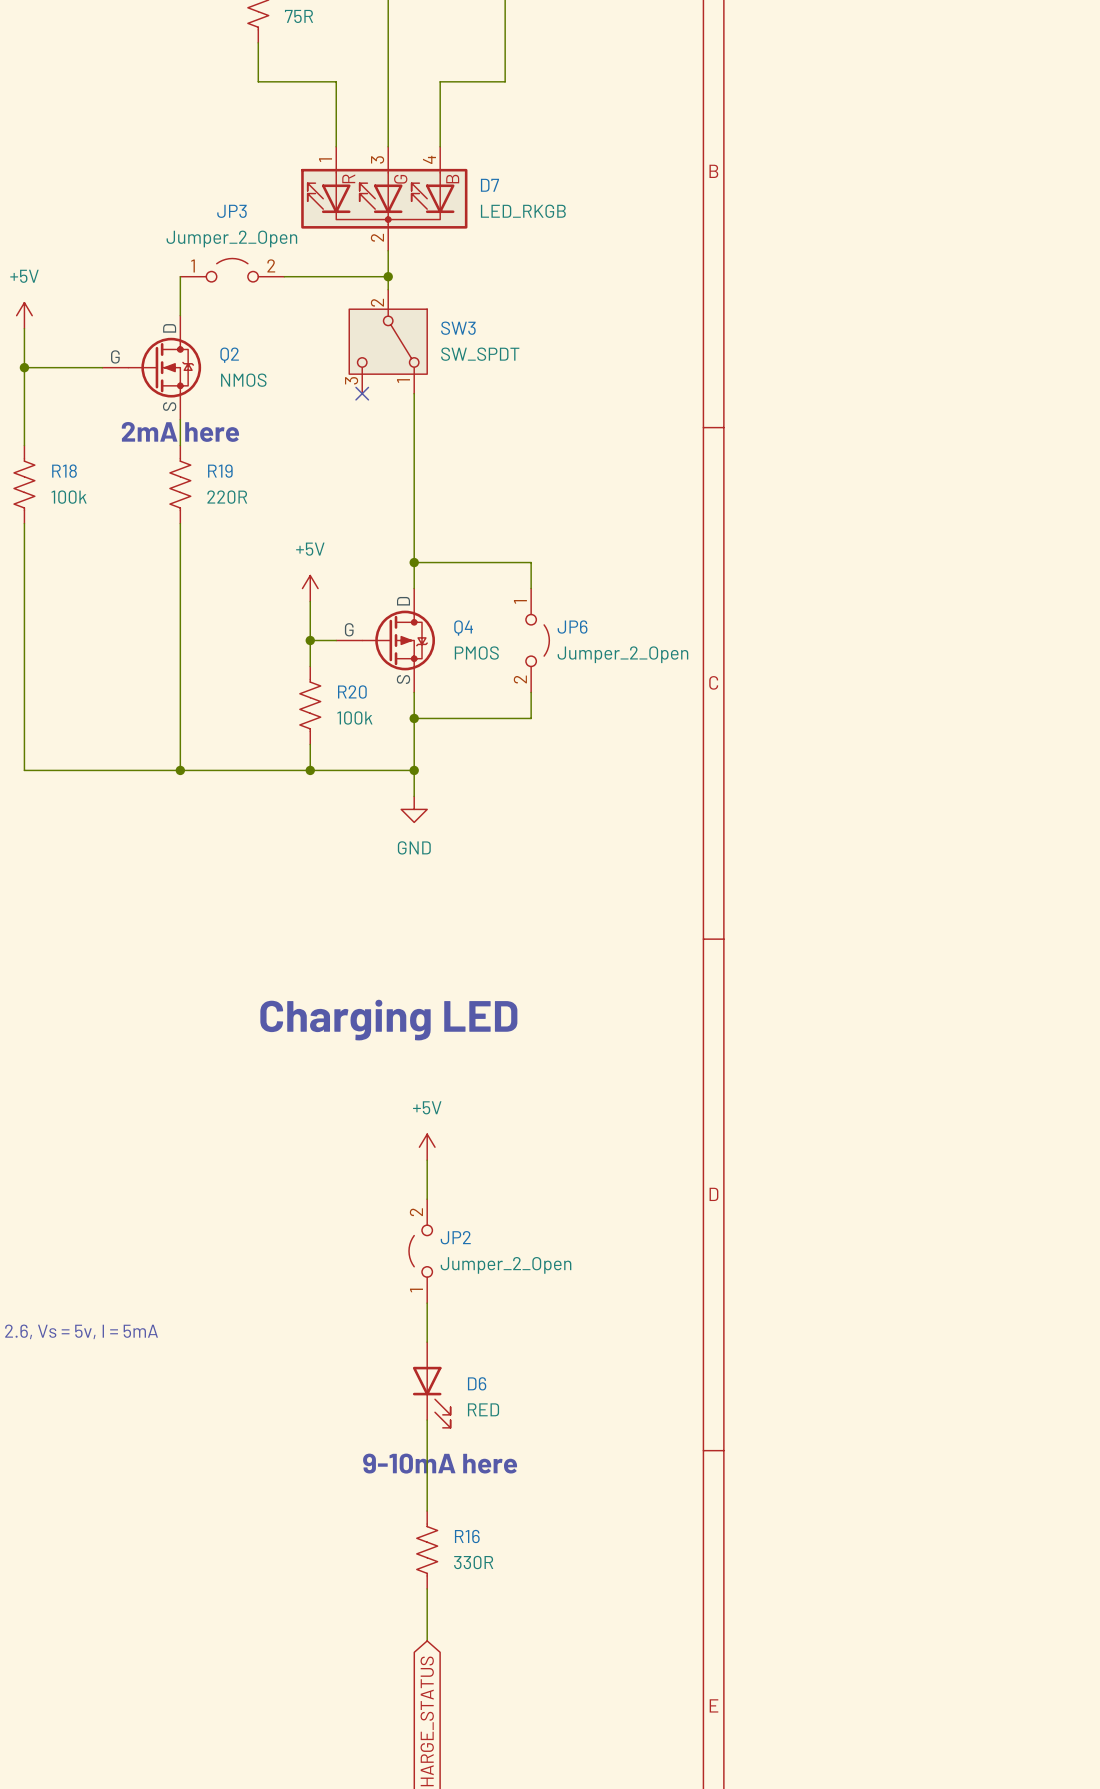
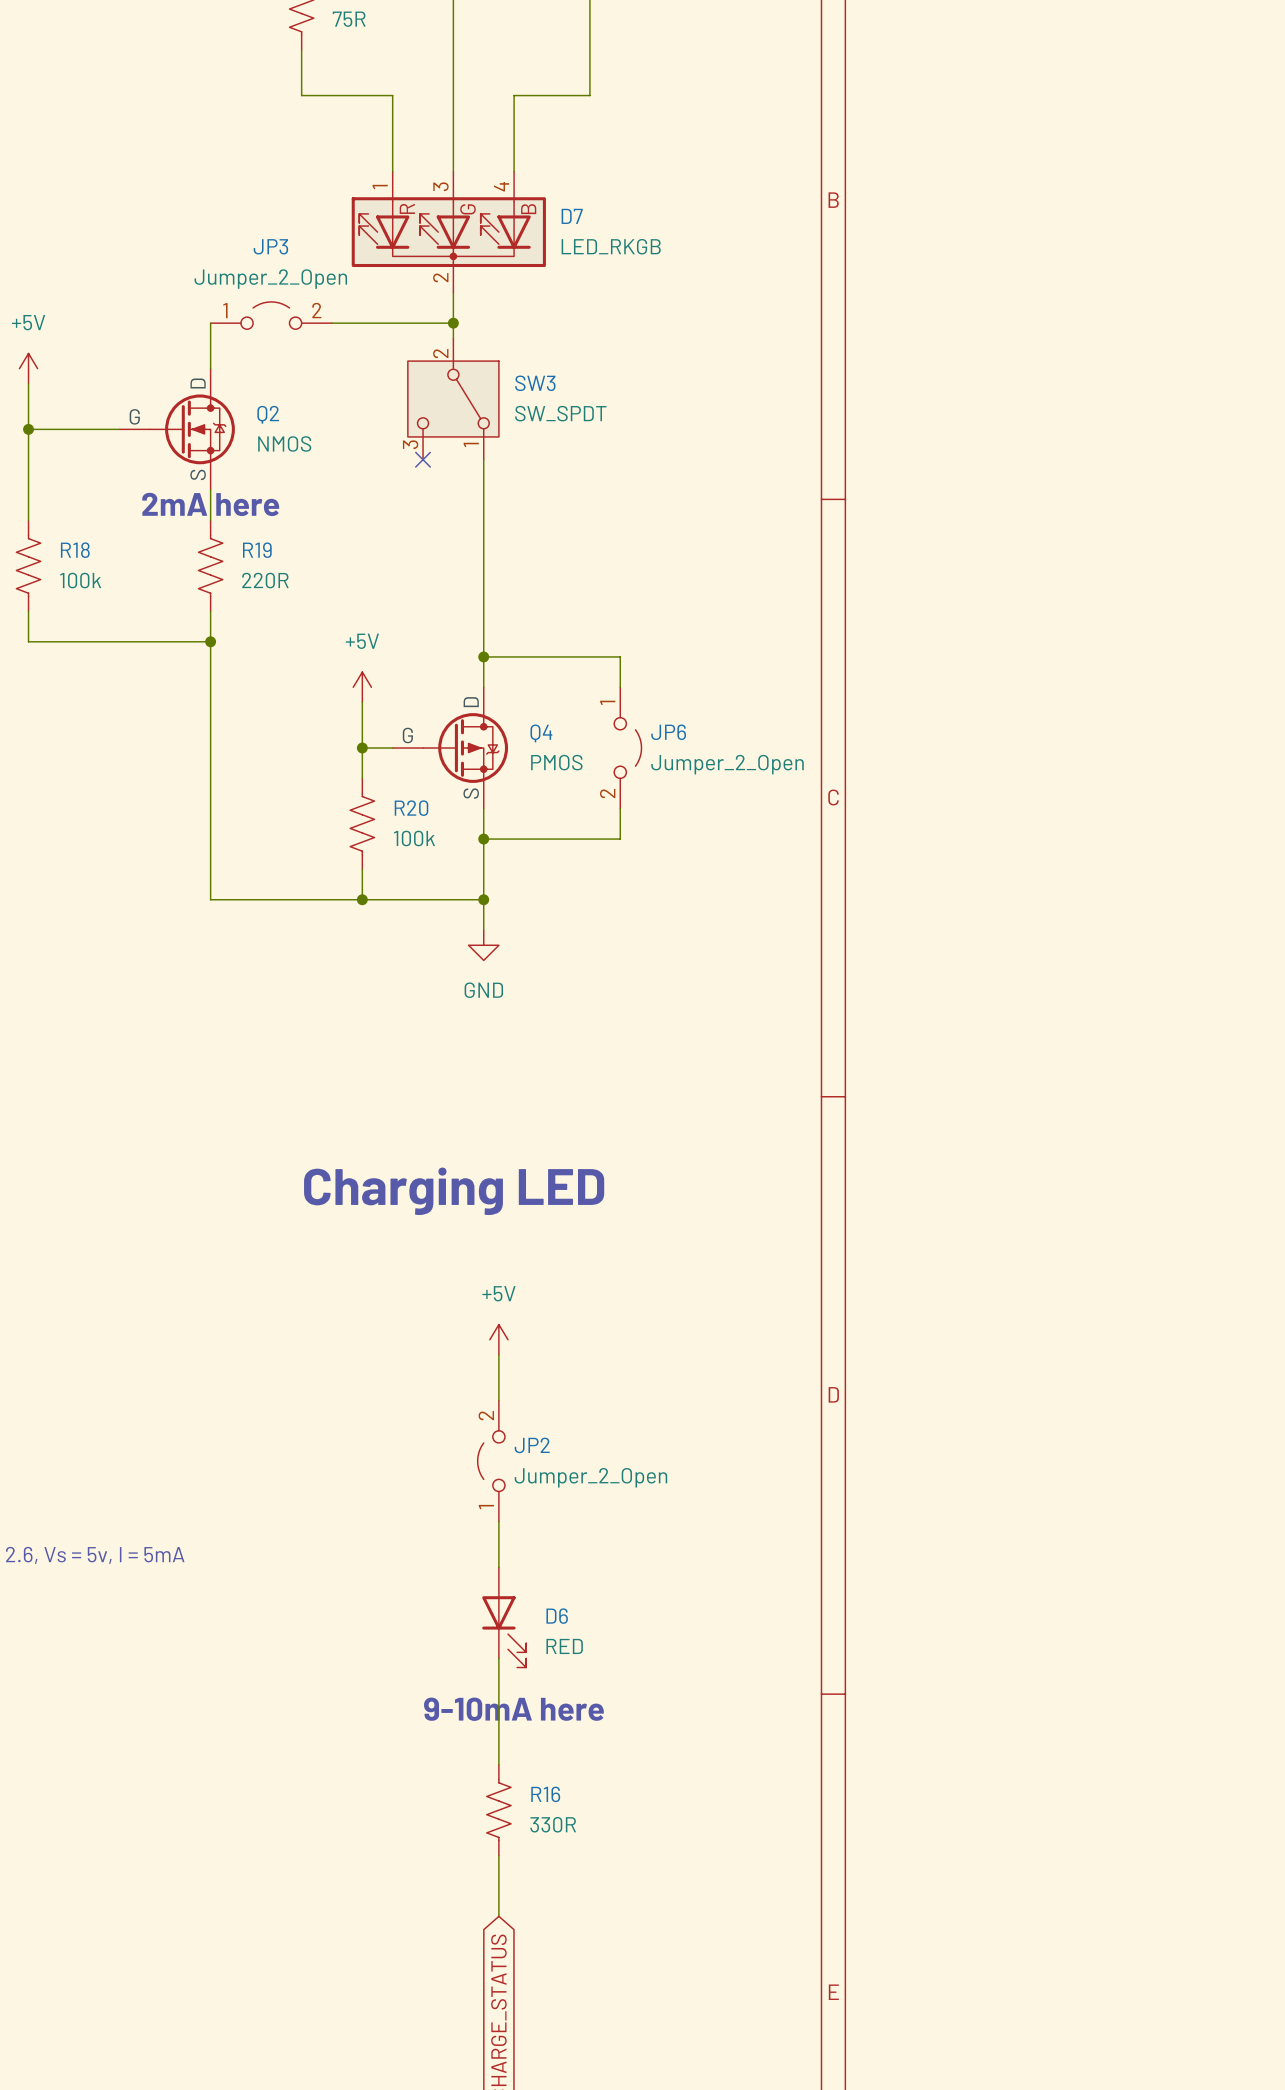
wire: (24, 549) (24, 770) (180, 770) -> (28, 641) (210, 641)
junction: none -> (210, 641)
junction: (180, 770) -> none

